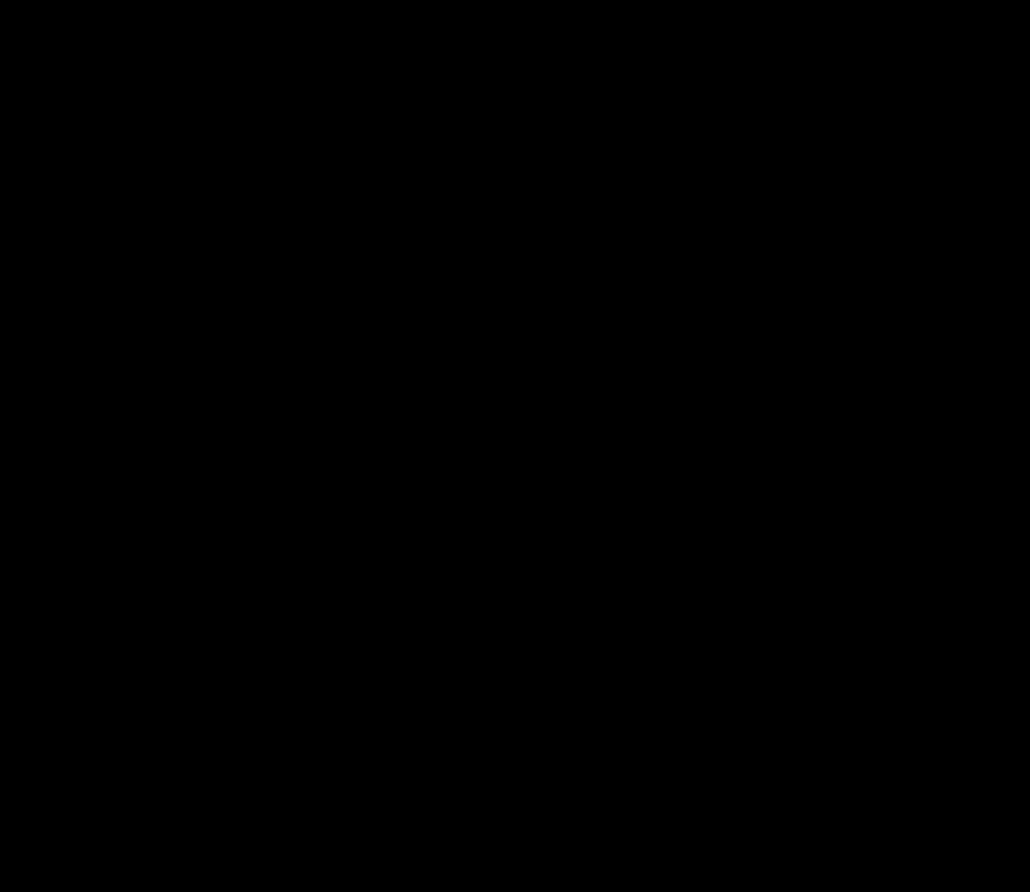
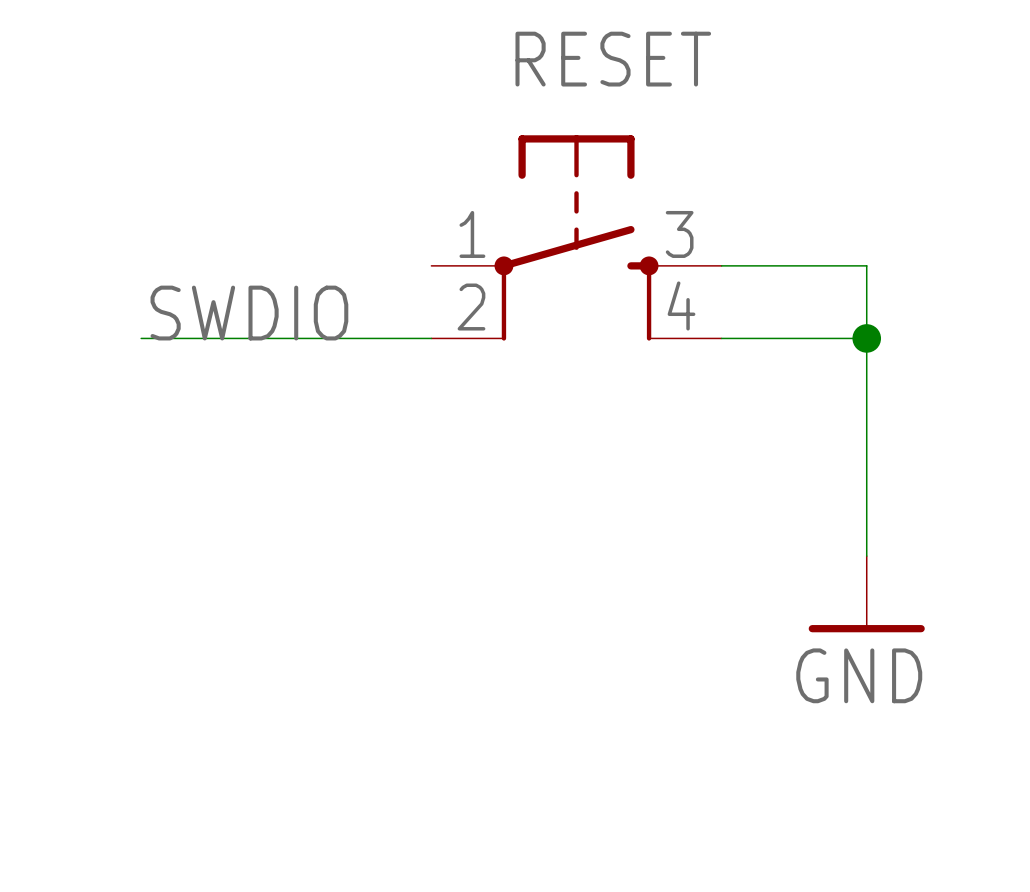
RESET: none -> (576, 237)
wire: none -> (721, 265) (866, 265) (866, 556)
label: none -> SWDIO (249, 313)
wire: none -> (141, 338) (431, 338)
wire: none -> (721, 338) (866, 338)
junction: none -> (866, 338)
power symbol: none -> GND (866, 594)

